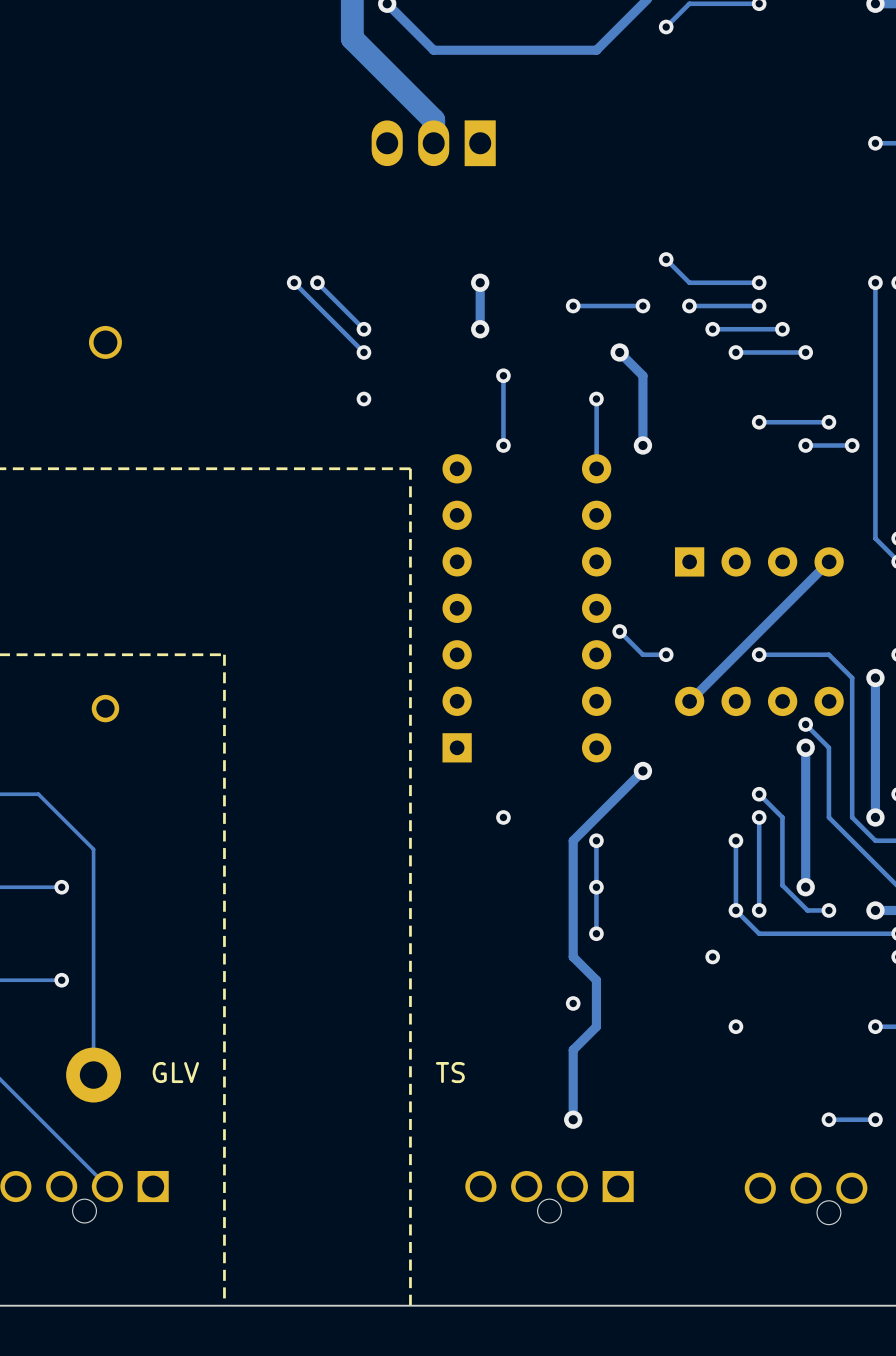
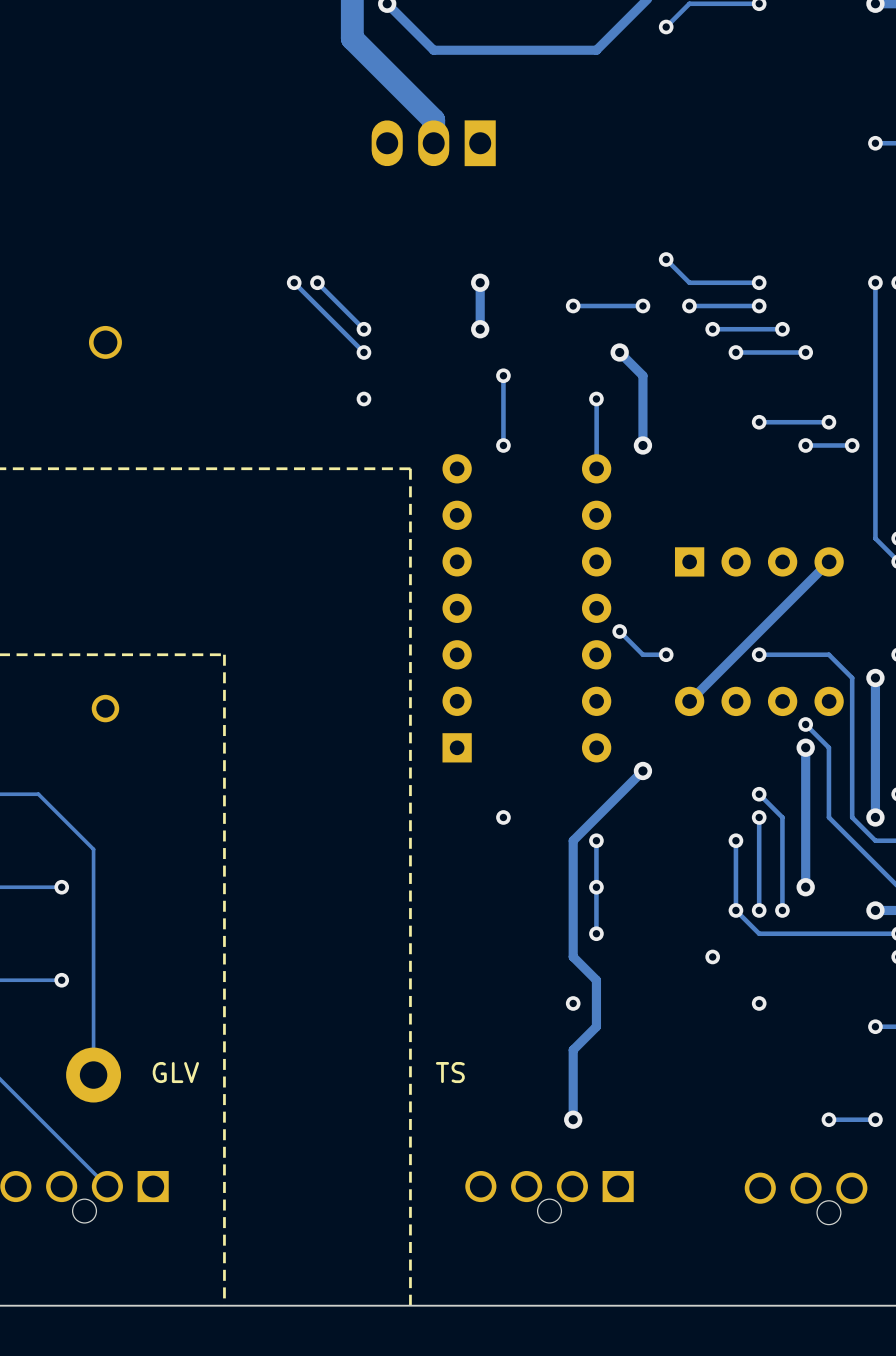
track: (782, 885) (807, 910) (828, 910) -> (782, 885) (782, 910)
via position: (828, 910) -> (782, 910)
via position: (735, 1026) -> (759, 1003)

